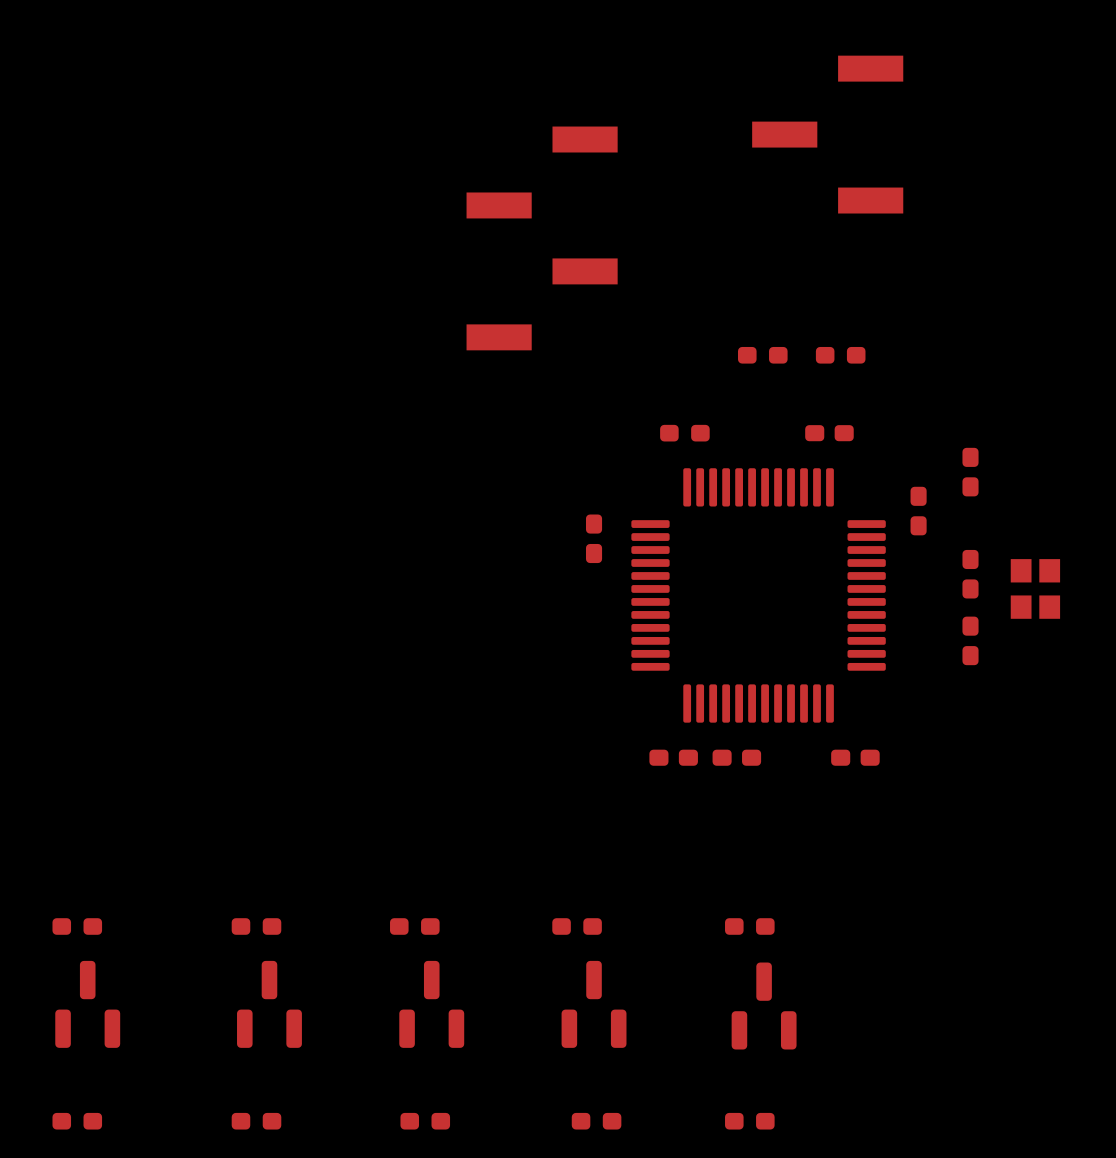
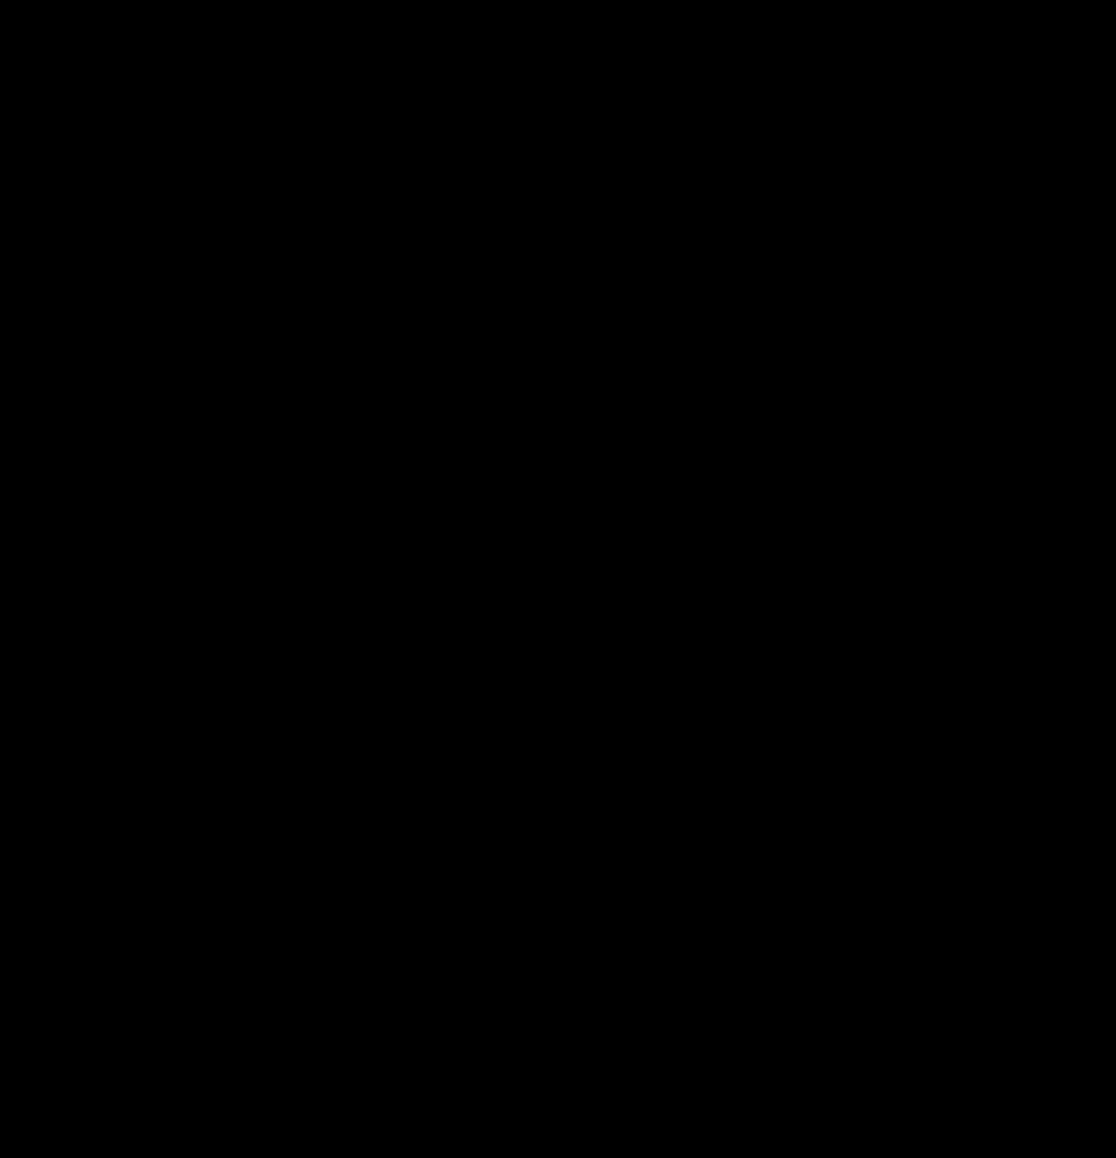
part: (827, 134) -> none
part: (542, 238) -> none
part: (762, 355) -> none
part: (840, 355) -> none
part: (684, 433) -> none
part: (829, 433) -> none
part: (970, 472) -> none
part: (918, 511) -> none
part: (594, 538) -> none
part: (970, 574) -> none
part: (1035, 588) -> none
part: (758, 595) -> none
part: (970, 640) -> none
part: (673, 757) -> none
part: (736, 757) -> none
part: (855, 757) -> none
part: (77, 926) -> none
part: (256, 926) -> none
part: (414, 926) -> none
part: (577, 926) -> none
part: (749, 926) -> none
part: (87, 1004) -> none
part: (269, 1004) -> none
part: (431, 1004) -> none
part: (594, 1004) -> none
part: (764, 1006) -> none
part: (77, 1121) -> none
part: (256, 1121) -> none
part: (425, 1121) -> none
part: (596, 1121) -> none
part: (749, 1121) -> none

